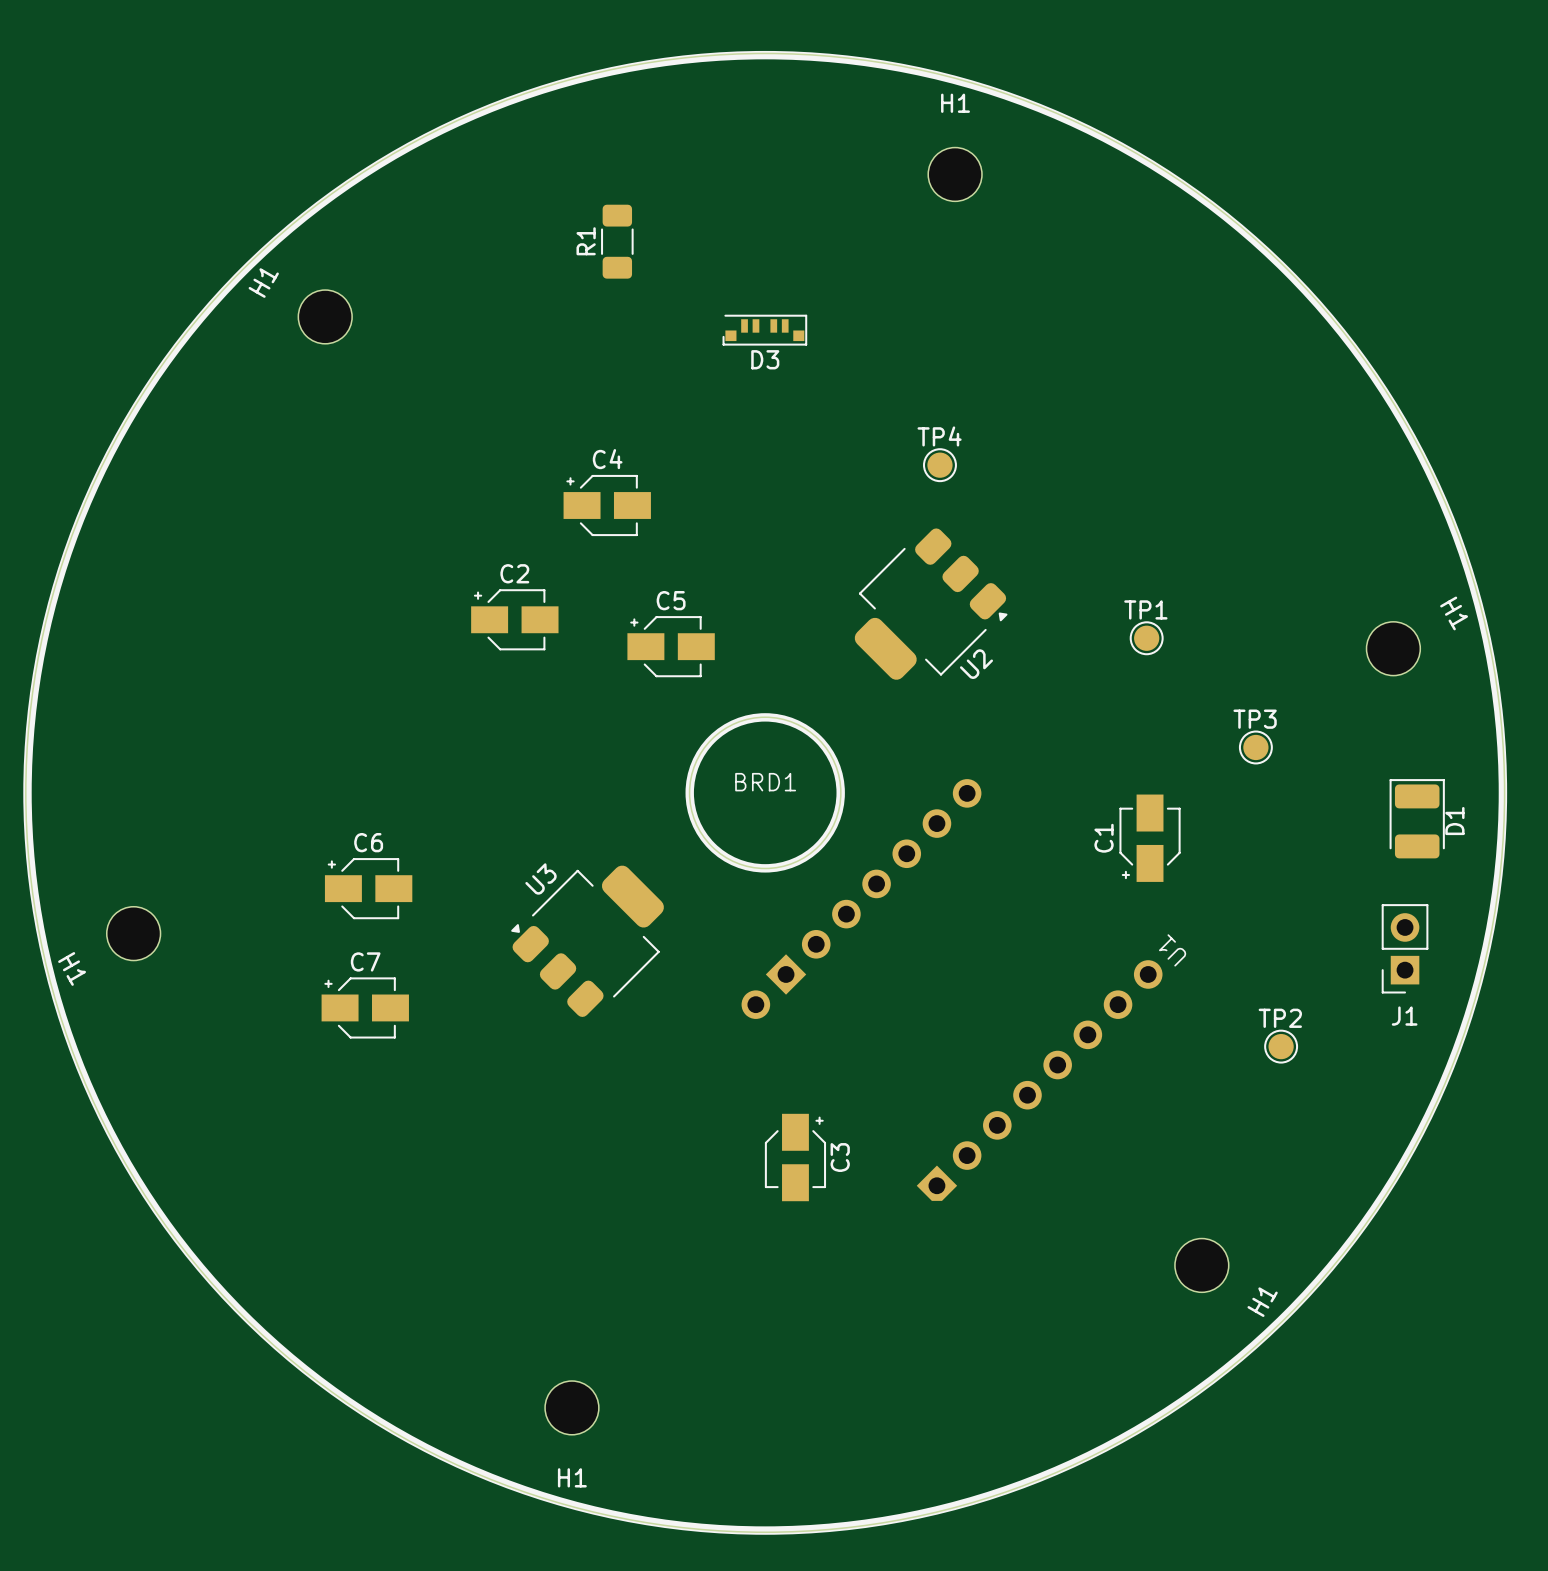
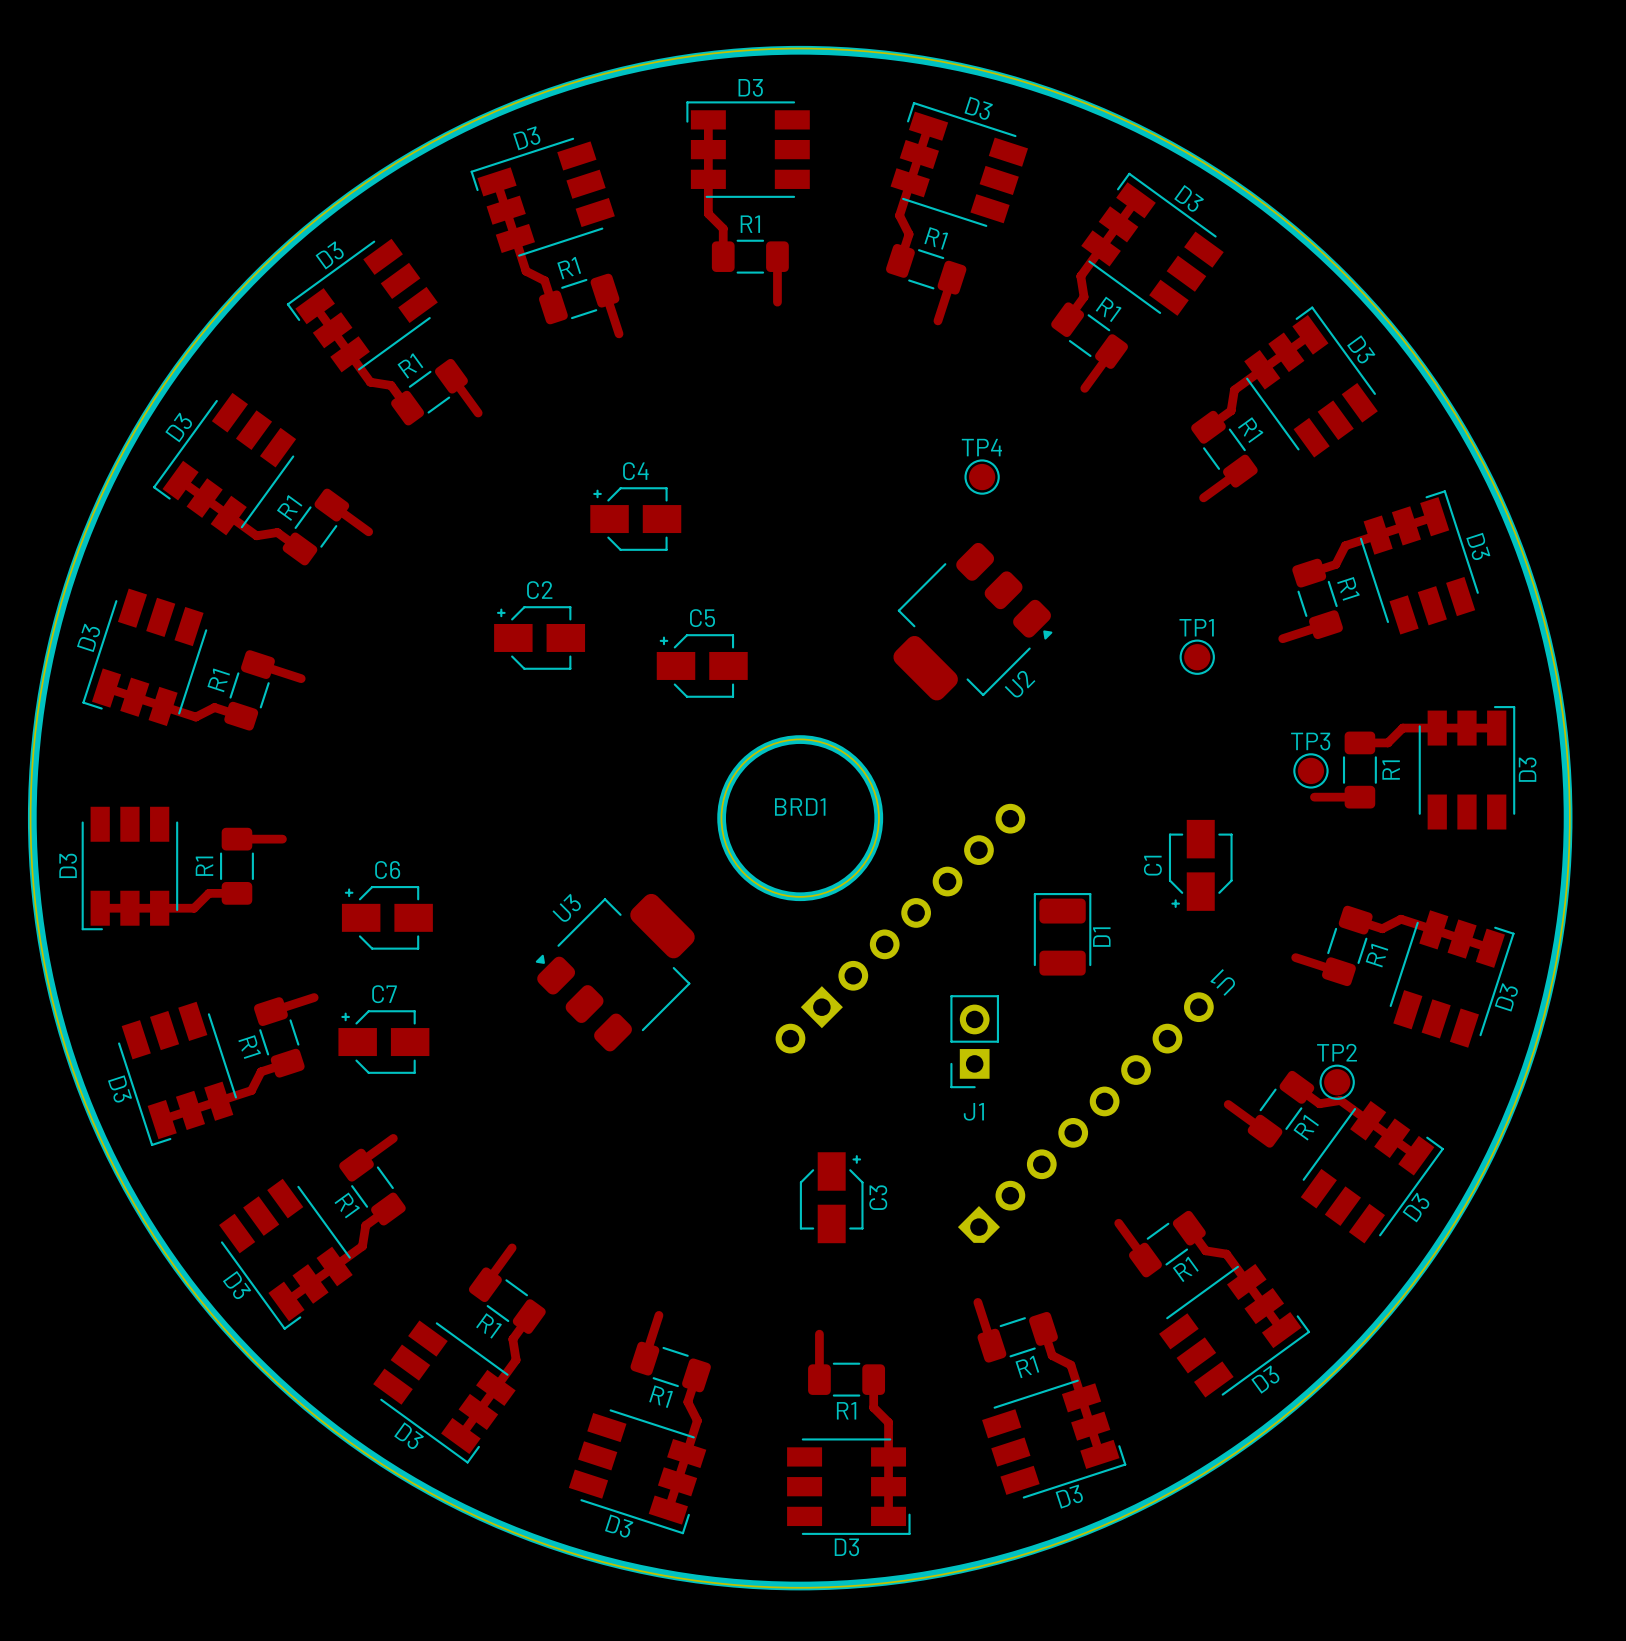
track: none -> (708, 119) (708, 213) (723, 228) (723, 256)
track: none -> (928, 126) (899, 215) (909, 234) (900, 260)
D3: none -> (748, 149)
D3: none -> (959, 164)
H1: (955, 174) -> none
track: none -> (497, 181) (526, 271) (544, 280) (553, 307)
D3: none -> (542, 197)
track: none -> (1136, 200) (1080, 276) (1084, 297) (1067, 319)
R1 rotation: 0° (617, 241) -> 90° clockwise (750, 256)
R1 position: (617, 241) -> (750, 256)
D3: none -> (1152, 244)
track: none -> (777, 256) (777, 302)
R1: none -> (926, 269)
track: none -> (951, 277) (937, 320)
track: none -> (604, 290) (619, 333)
R1: none -> (579, 299)
D3: none -> (362, 305)
track: none -> (315, 306) (370, 382) (391, 385) (407, 408)
H1: (325, 316) -> none
track: none -> (1310, 334) (1234, 390) (1231, 410) (1208, 427)
R1: none -> (1089, 335)
D3: (764, 330) -> none
track: none -> (1111, 351) (1084, 388)
track: none -> (451, 376) (478, 413)
D3: none -> (1311, 382)
R1: none -> (429, 392)
R1: none -> (1224, 449)
D3: none -> (224, 464)
track: none -> (1240, 471) (1203, 497)
track: none -> (180, 480) (256, 535) (277, 532) (300, 548)
track: none -> (331, 505) (368, 531)
track: none -> (1434, 516) (1345, 545) (1335, 564) (1309, 573)
R1: none -> (315, 527)
D3: none -> (1419, 562)
R1: none -> (1317, 598)
track: none -> (1325, 624) (1282, 638)
D3: none -> (144, 657)
track: none -> (257, 664) (301, 678)
H1: (1393, 648) -> none
track: none -> (106, 688) (195, 717) (214, 707) (241, 716)
R1: none -> (249, 690)
track: none -> (1496, 728) (1402, 728) (1387, 742) (1359, 742)
D3: none -> (1466, 767)
R1: none -> (1359, 770)
track: none -> (1314, 797) (1359, 797)
track: none -> (236, 839) (282, 839)
D1 position: (1417, 818) -> (1062, 934)
R1: none -> (236, 866)
D3: none -> (129, 868)
track: none -> (236, 893) (208, 893) (194, 908) (100, 908)
track: none -> (1355, 920) (1382, 928) (1401, 919) (1490, 948)
R1: none -> (1347, 945)
track: none -> (1295, 957) (1338, 971)
H1: (133, 933) -> none
D3: none -> (1452, 978)
J1 position: (1405, 948) -> (974, 1041)
track: none -> (314, 997) (270, 1011)
R1: none -> (279, 1037)
track: none -> (287, 1063) (261, 1071) (251, 1090) (162, 1119)
D3: none -> (177, 1073)
track: none -> (1296, 1087) (1319, 1103) (1340, 1100) (1416, 1155)
track: none -> (1228, 1104) (1265, 1131)
R1: none -> (1280, 1109)
track: none -> (393, 1138) (356, 1165)
D3: none -> (1372, 1172)
R1: none -> (372, 1187)
track: none -> (388, 1209) (365, 1225) (362, 1246) (286, 1301)
track: none -> (1118, 1223) (1145, 1260)
track: none -> (1189, 1228) (1205, 1250) (1226, 1254) (1281, 1330)
R1: none -> (1167, 1244)
track: none -> (512, 1247) (485, 1284)
D3: none -> (285, 1254)
R1: none -> (507, 1300)
track: none -> (977, 1302) (991, 1345)
H1: (1201, 1265) -> none
track: none -> (658, 1315) (644, 1358)
track: none -> (529, 1316) (512, 1339) (516, 1360) (460, 1436)
track: none -> (1043, 1328) (1052, 1355) (1070, 1365) (1099, 1454)
D3: none -> (1234, 1330)
track: none -> (819, 1334) (819, 1379)
R1: none -> (1017, 1337)
R1: none -> (670, 1367)
track: none -> (696, 1375) (687, 1402) (697, 1420) (668, 1510)
R1: none -> (846, 1379)
track: none -> (873, 1379) (873, 1407) (888, 1422) (888, 1516)
D3: none -> (444, 1392)
D3: none -> (1054, 1439)
H1: (571, 1407) -> none
D3: none -> (637, 1471)
D3: none -> (848, 1486)

